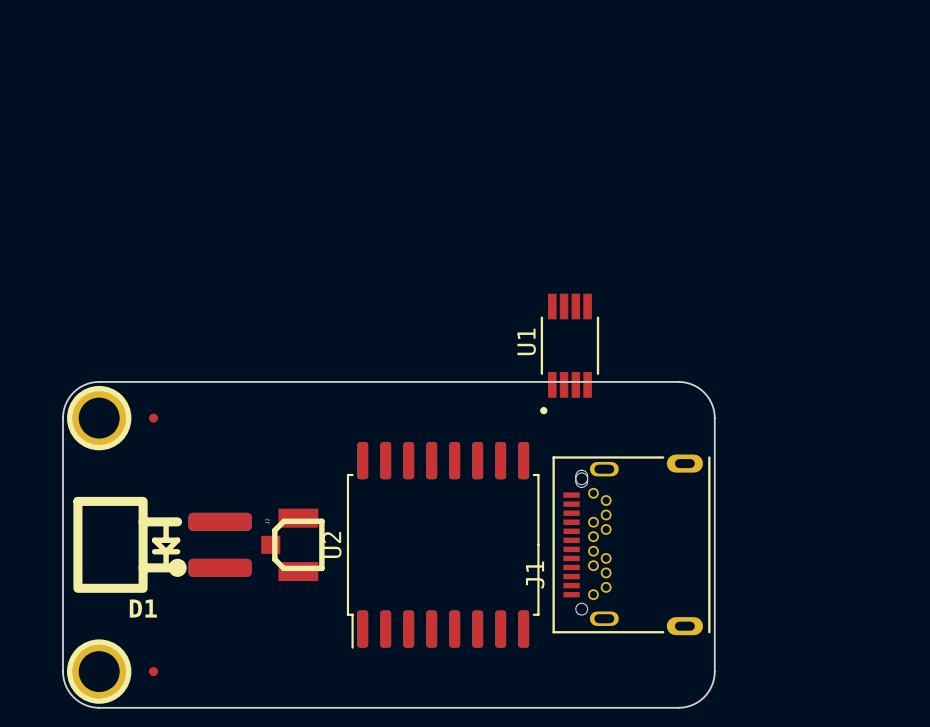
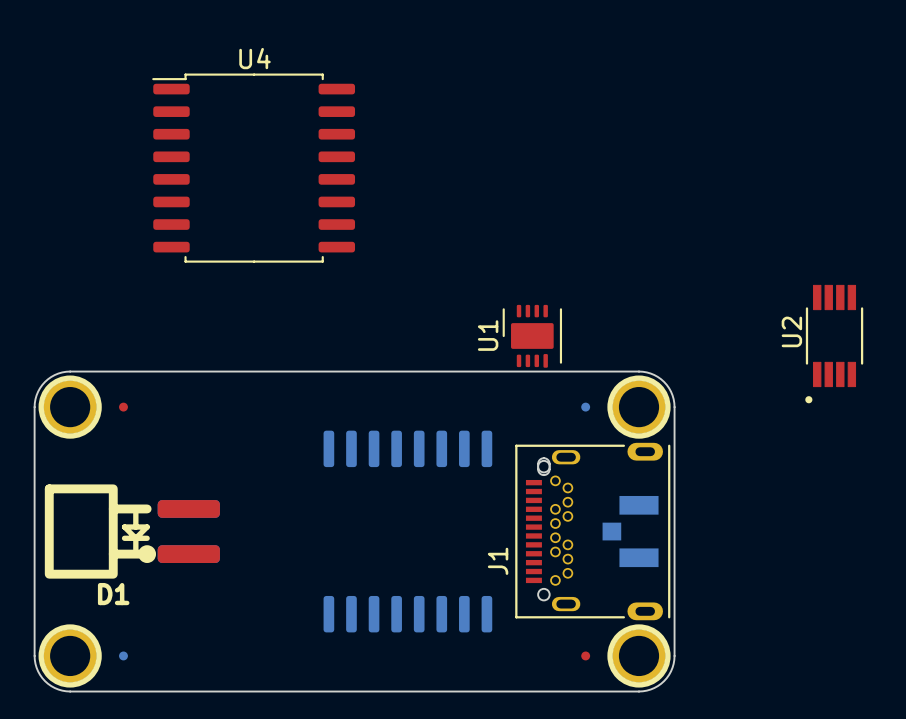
U4: none -> (253, 168)
U1 footprint: [540, 293, 600, 415] -> [502, 304, 563, 368]
part: none -> (585, 407)
part: none -> (639, 407)
U2 footprint: [346, 442, 540, 649] -> [805, 284, 864, 404]
part: (292, 544) -> none
part: none -> (630, 531)
U2 name position: U2 (332, 545) -> U2 (791, 331)
part side: top (153, 671) -> bottom (123, 655)
part: none -> (585, 655)
part: none -> (639, 655)

